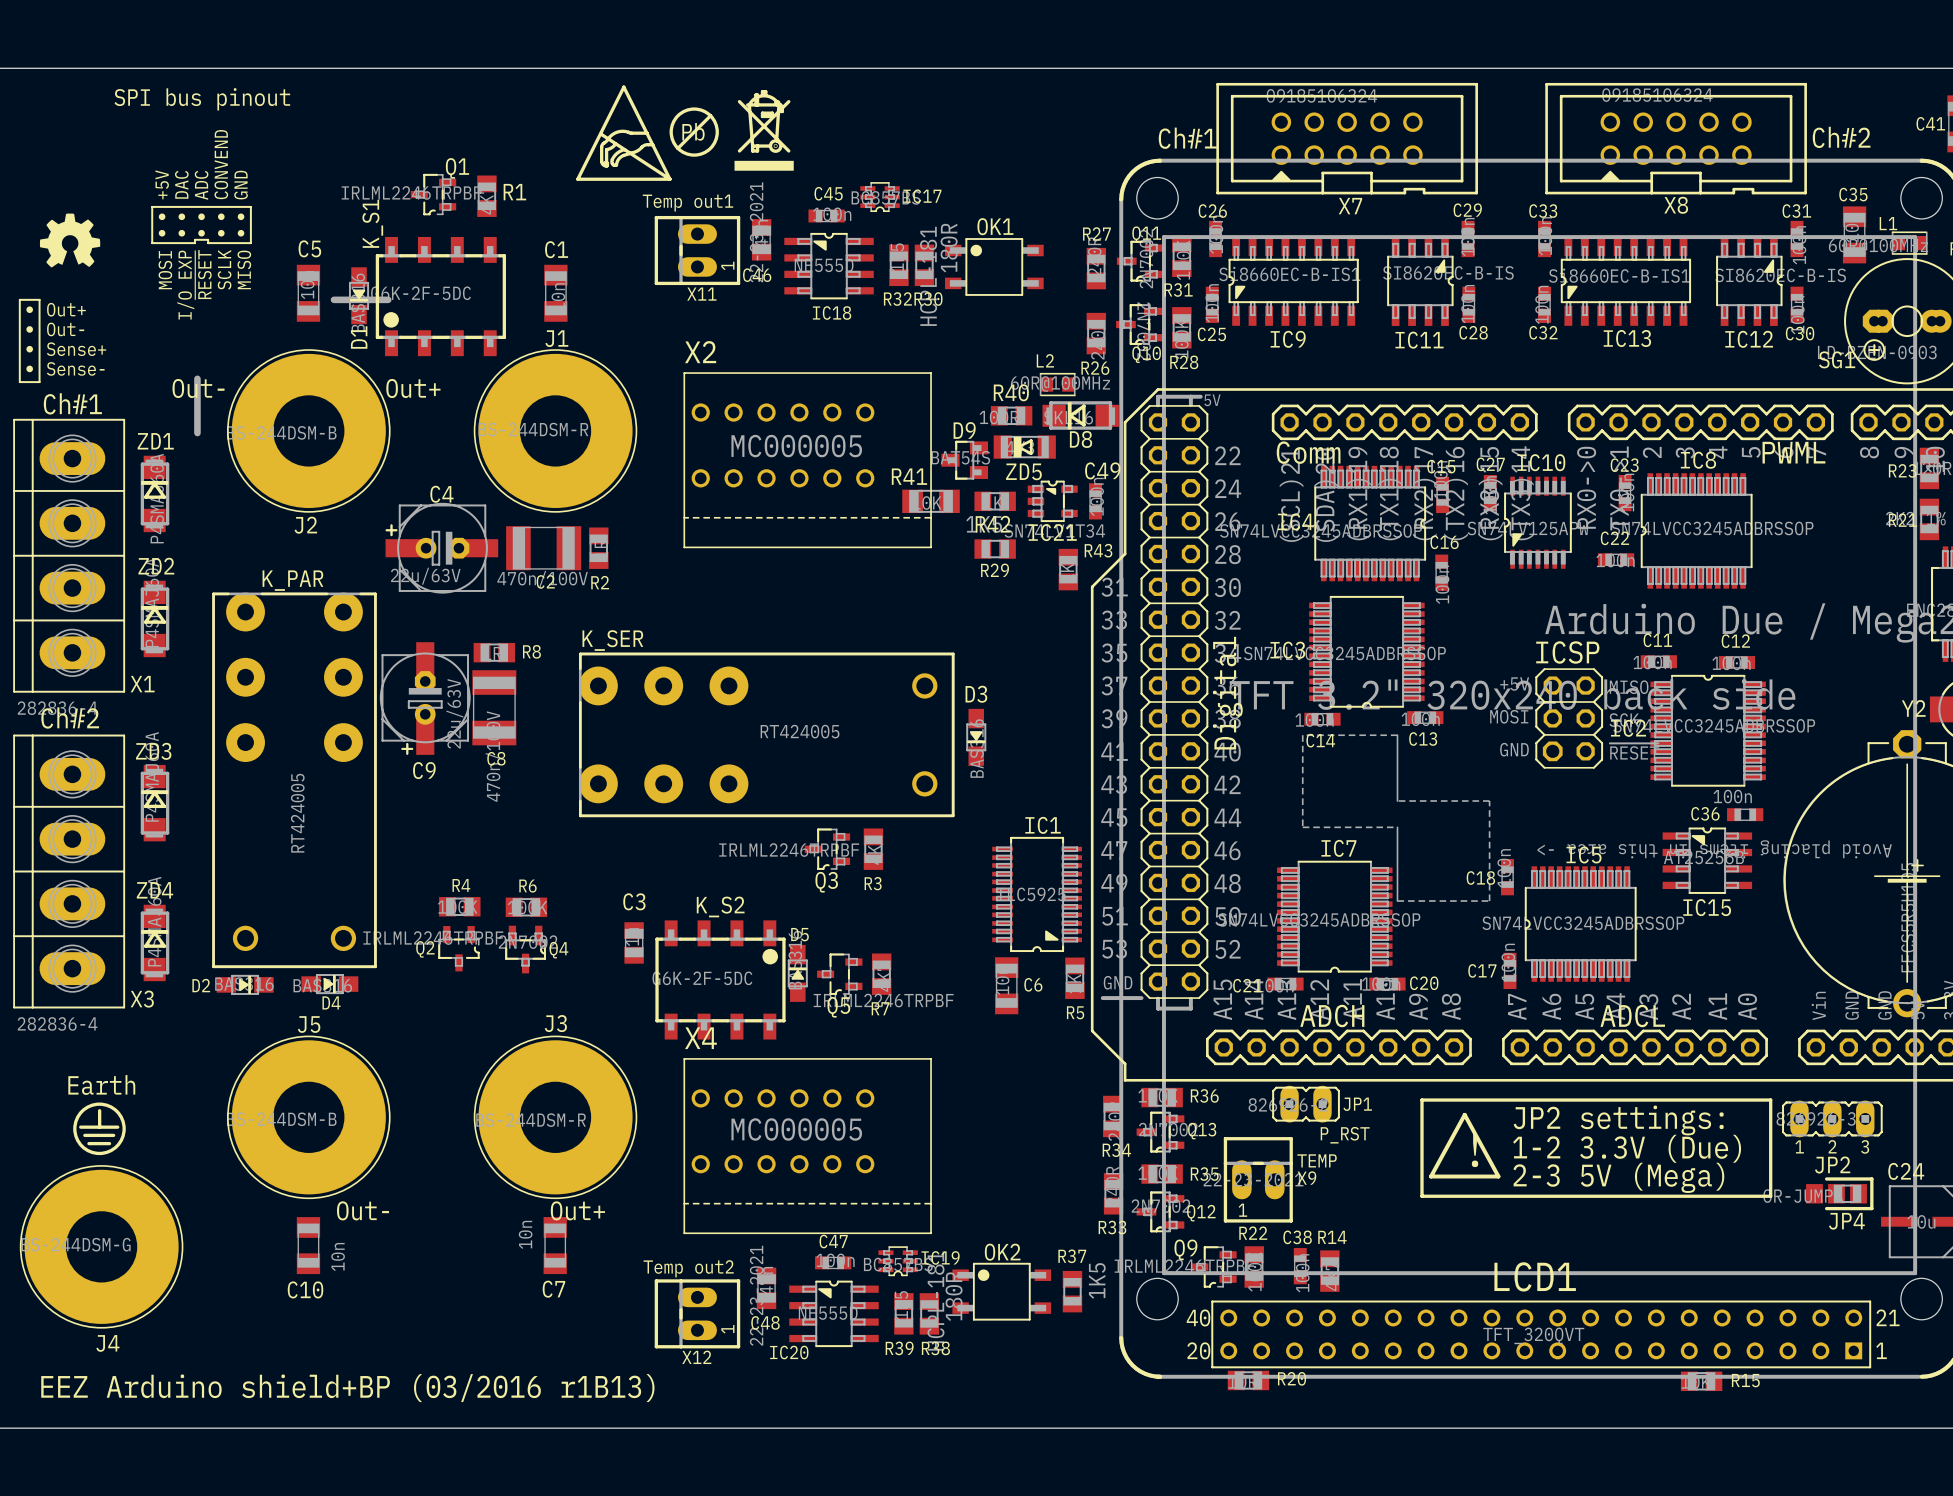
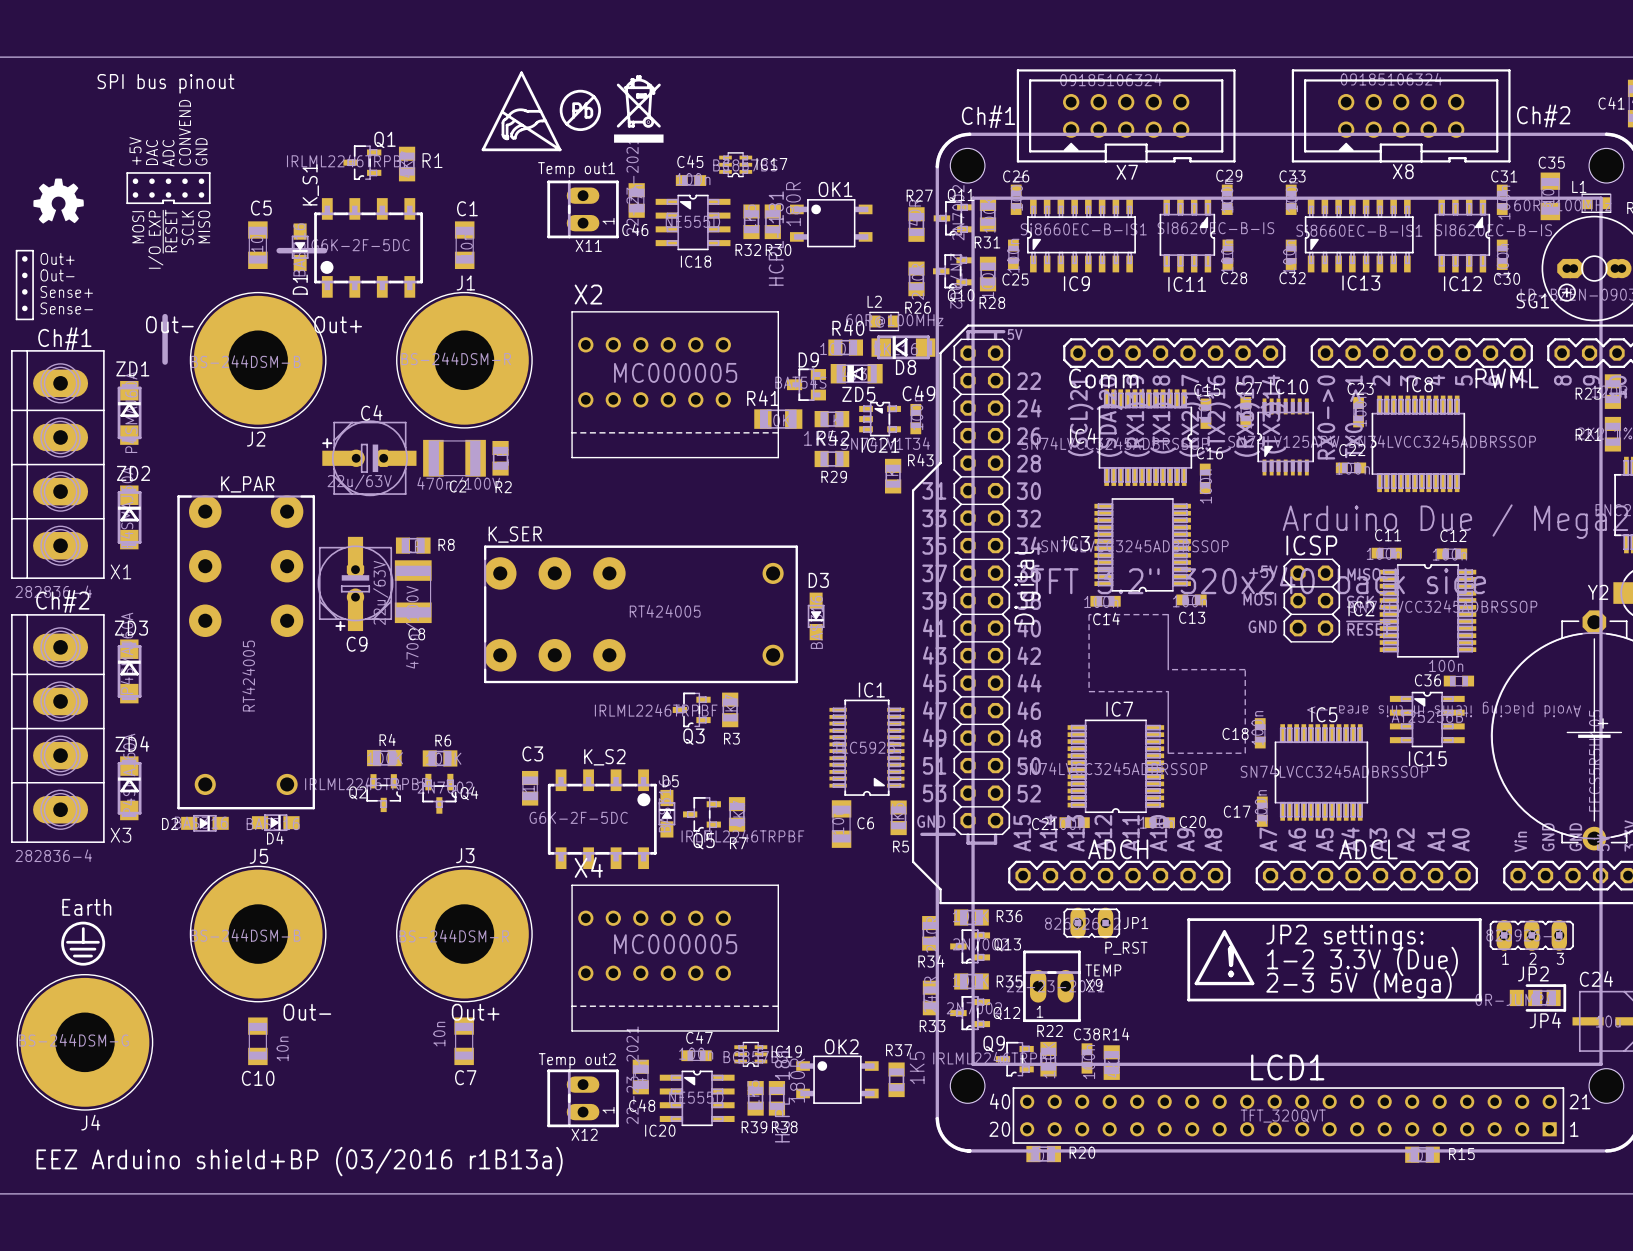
text: EEZ Arduino shield+BP (03/2016 r1B13) (347, 1388) -> EEZ Arduino shield+BP (03/2016 r1B13a) (299, 1161)

